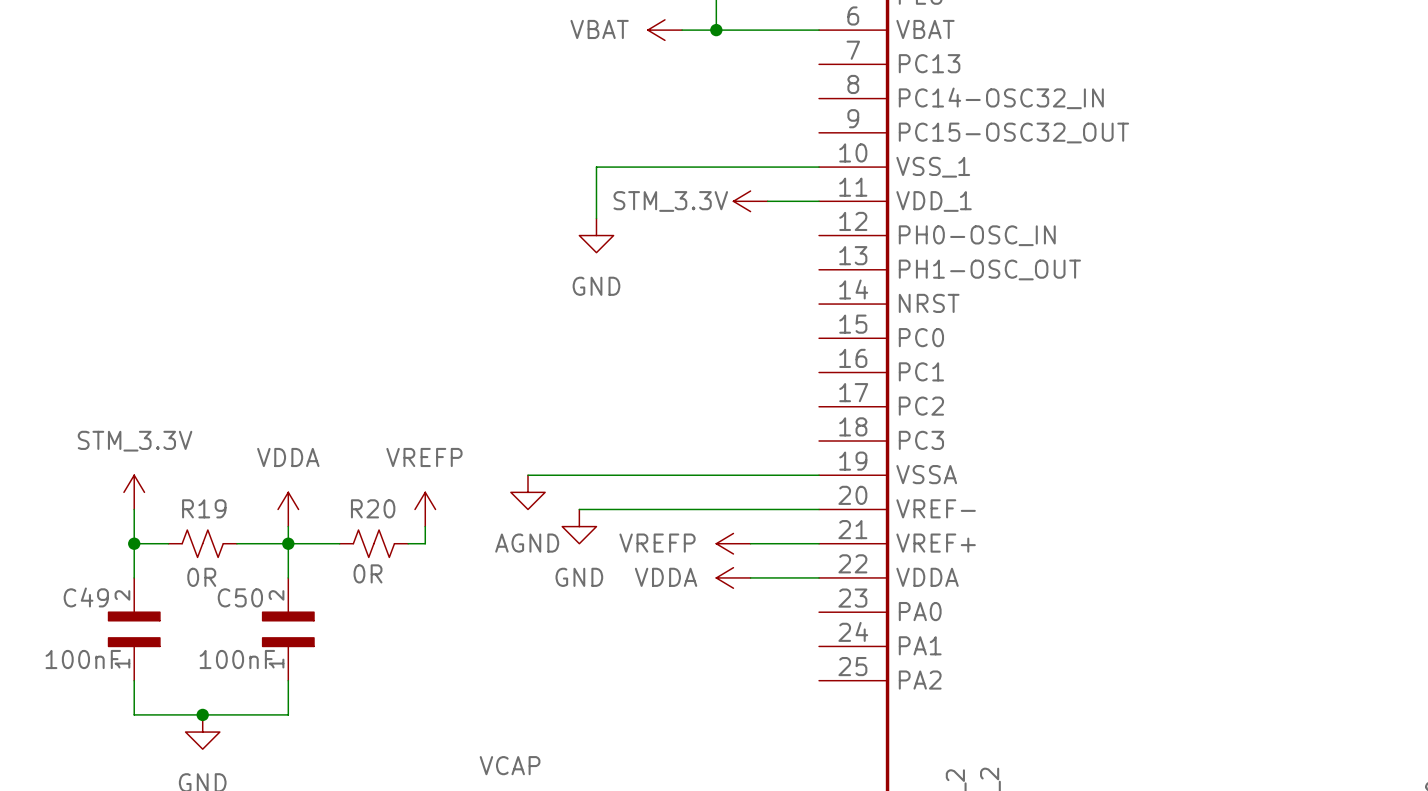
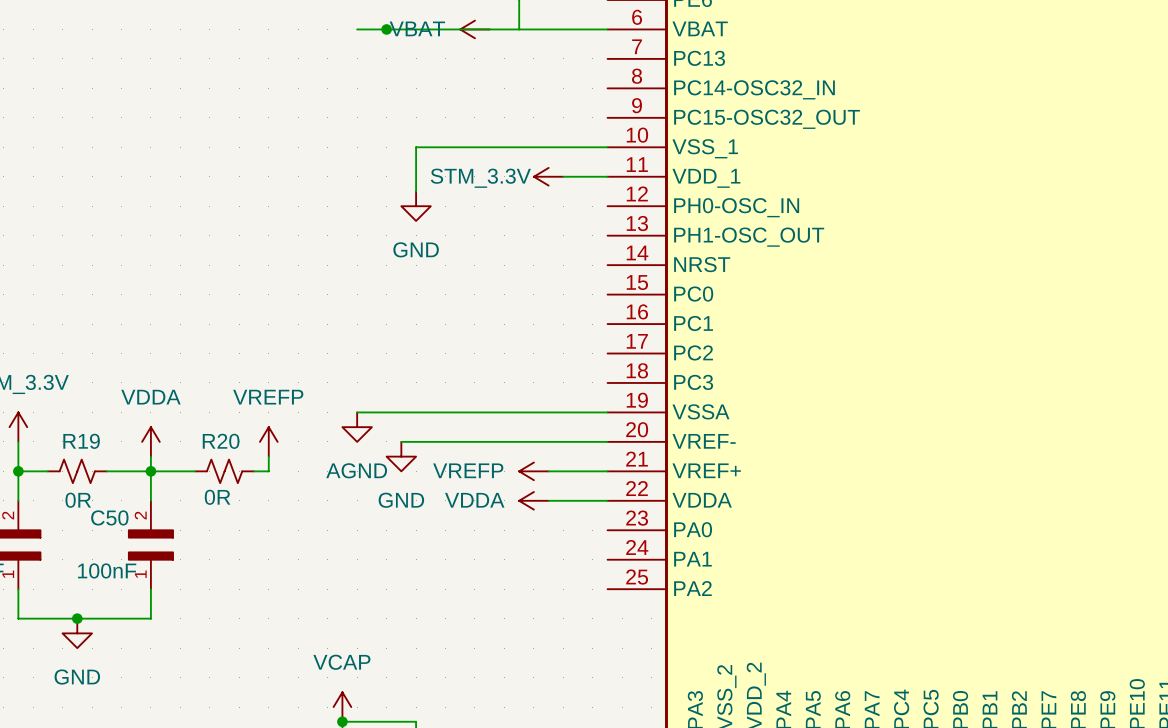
wire: none -> (357, 29) (489, 29)
junction: none -> (386, 29)
junction: (716, 30) -> none

